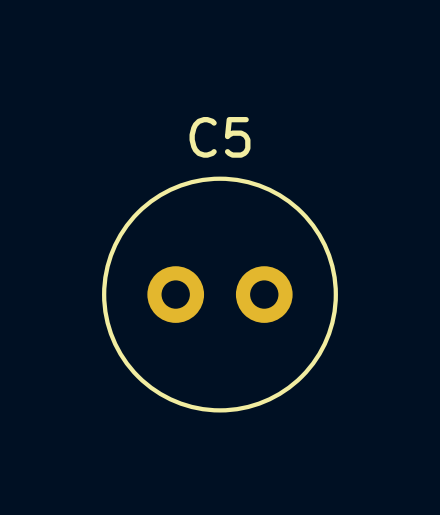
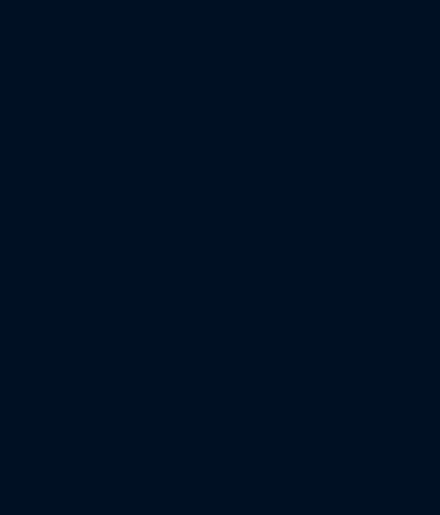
C5: (219, 294) -> none

